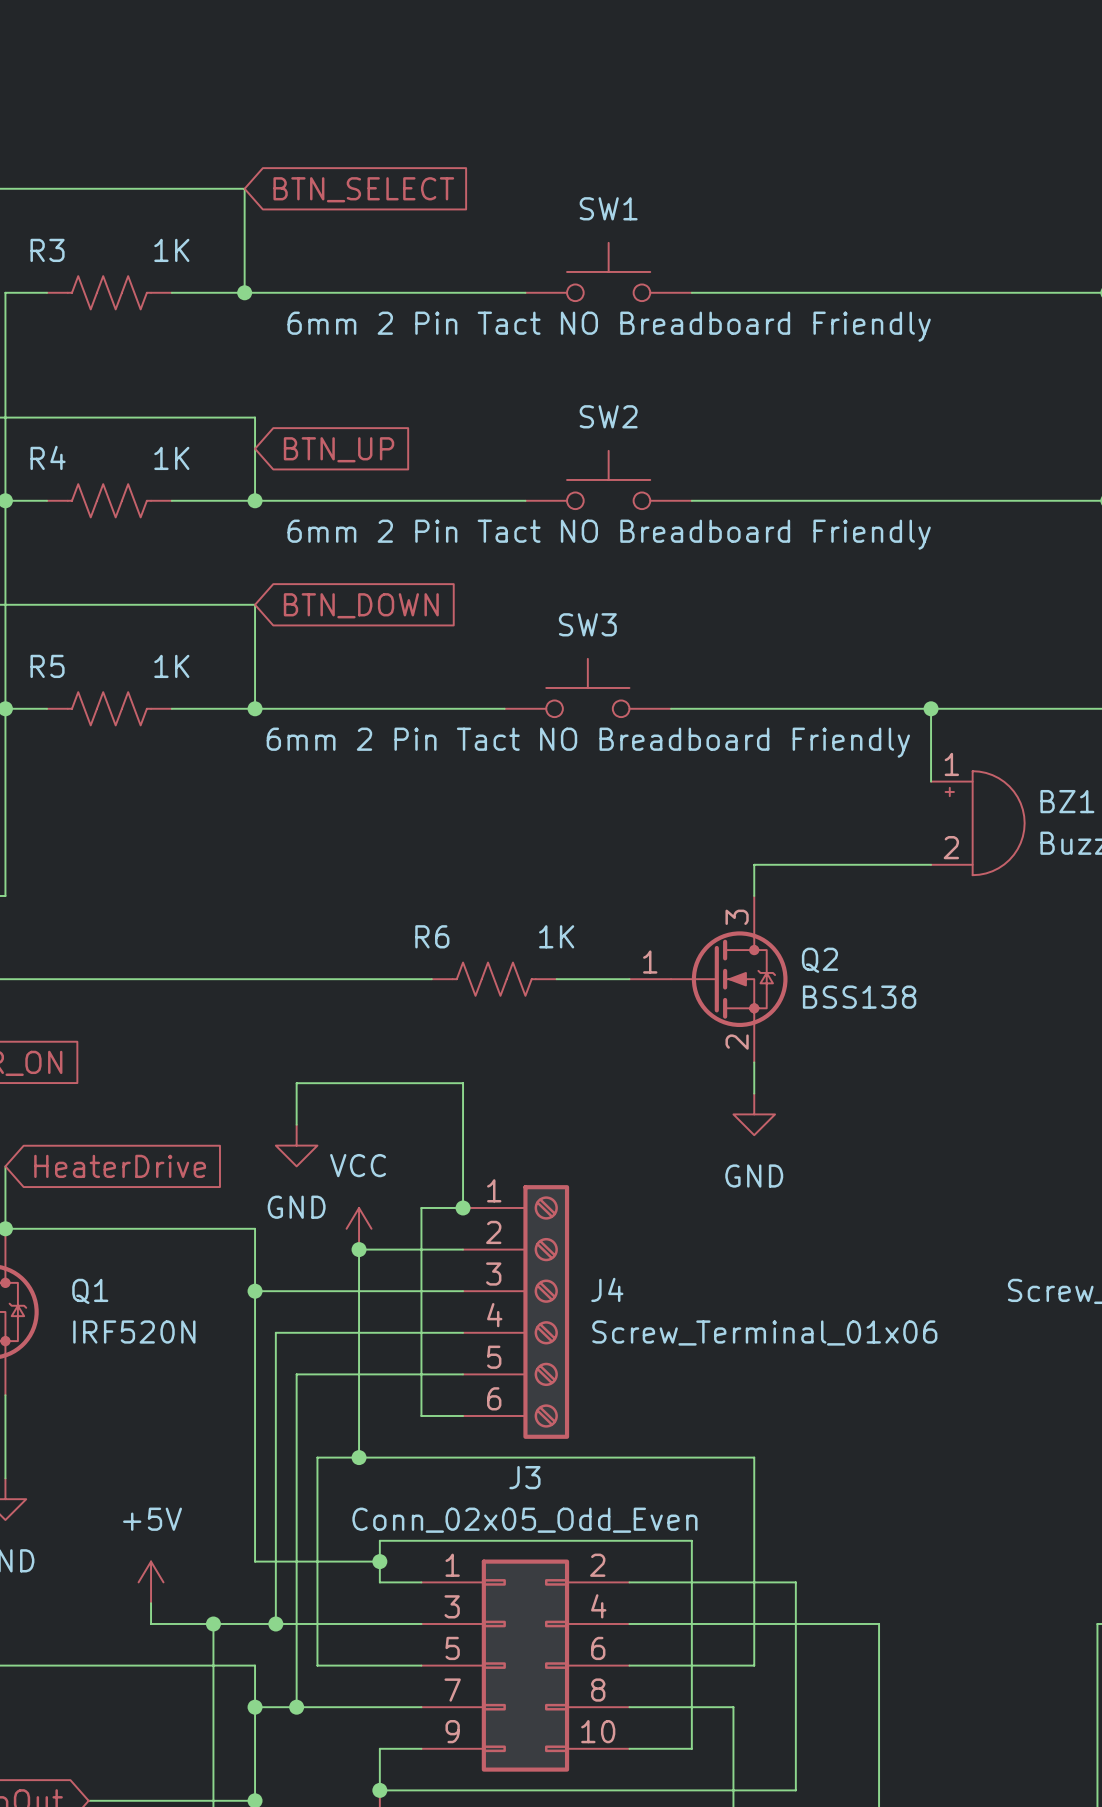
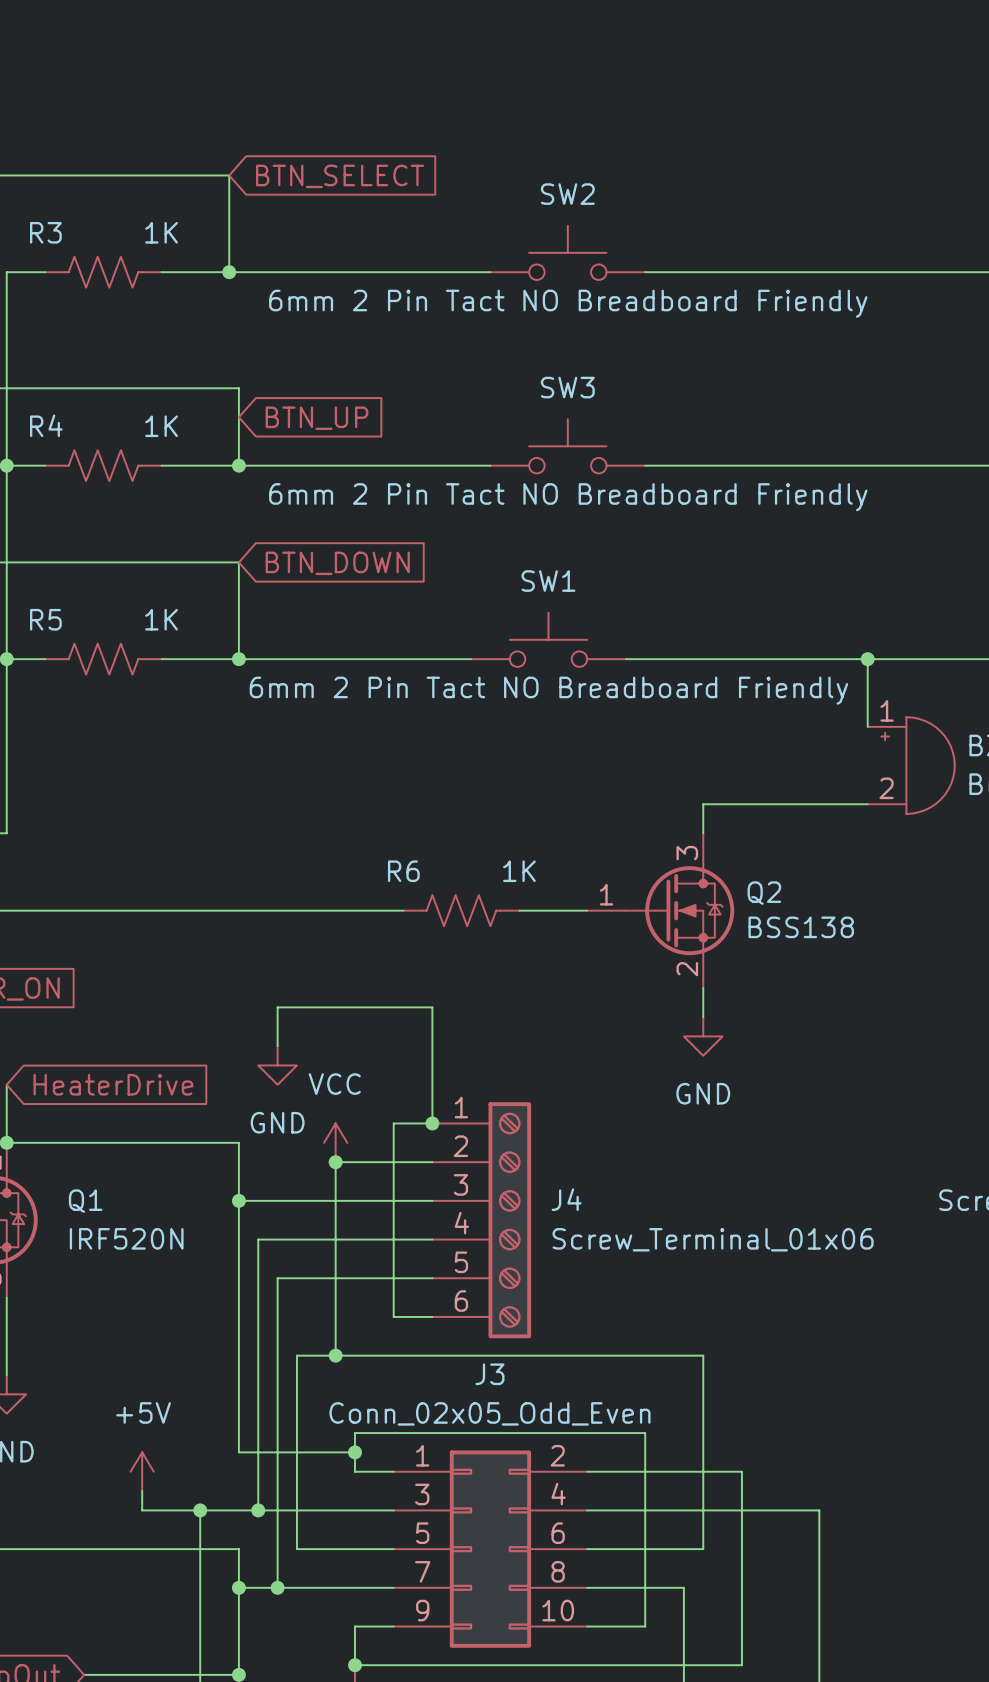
SW1 name: SW1 (608, 208) -> SW2 (567, 194)
SW2 name: SW2 (608, 416) -> SW3 (567, 387)
SW3 name: SW3 (587, 624) -> SW1 (548, 581)

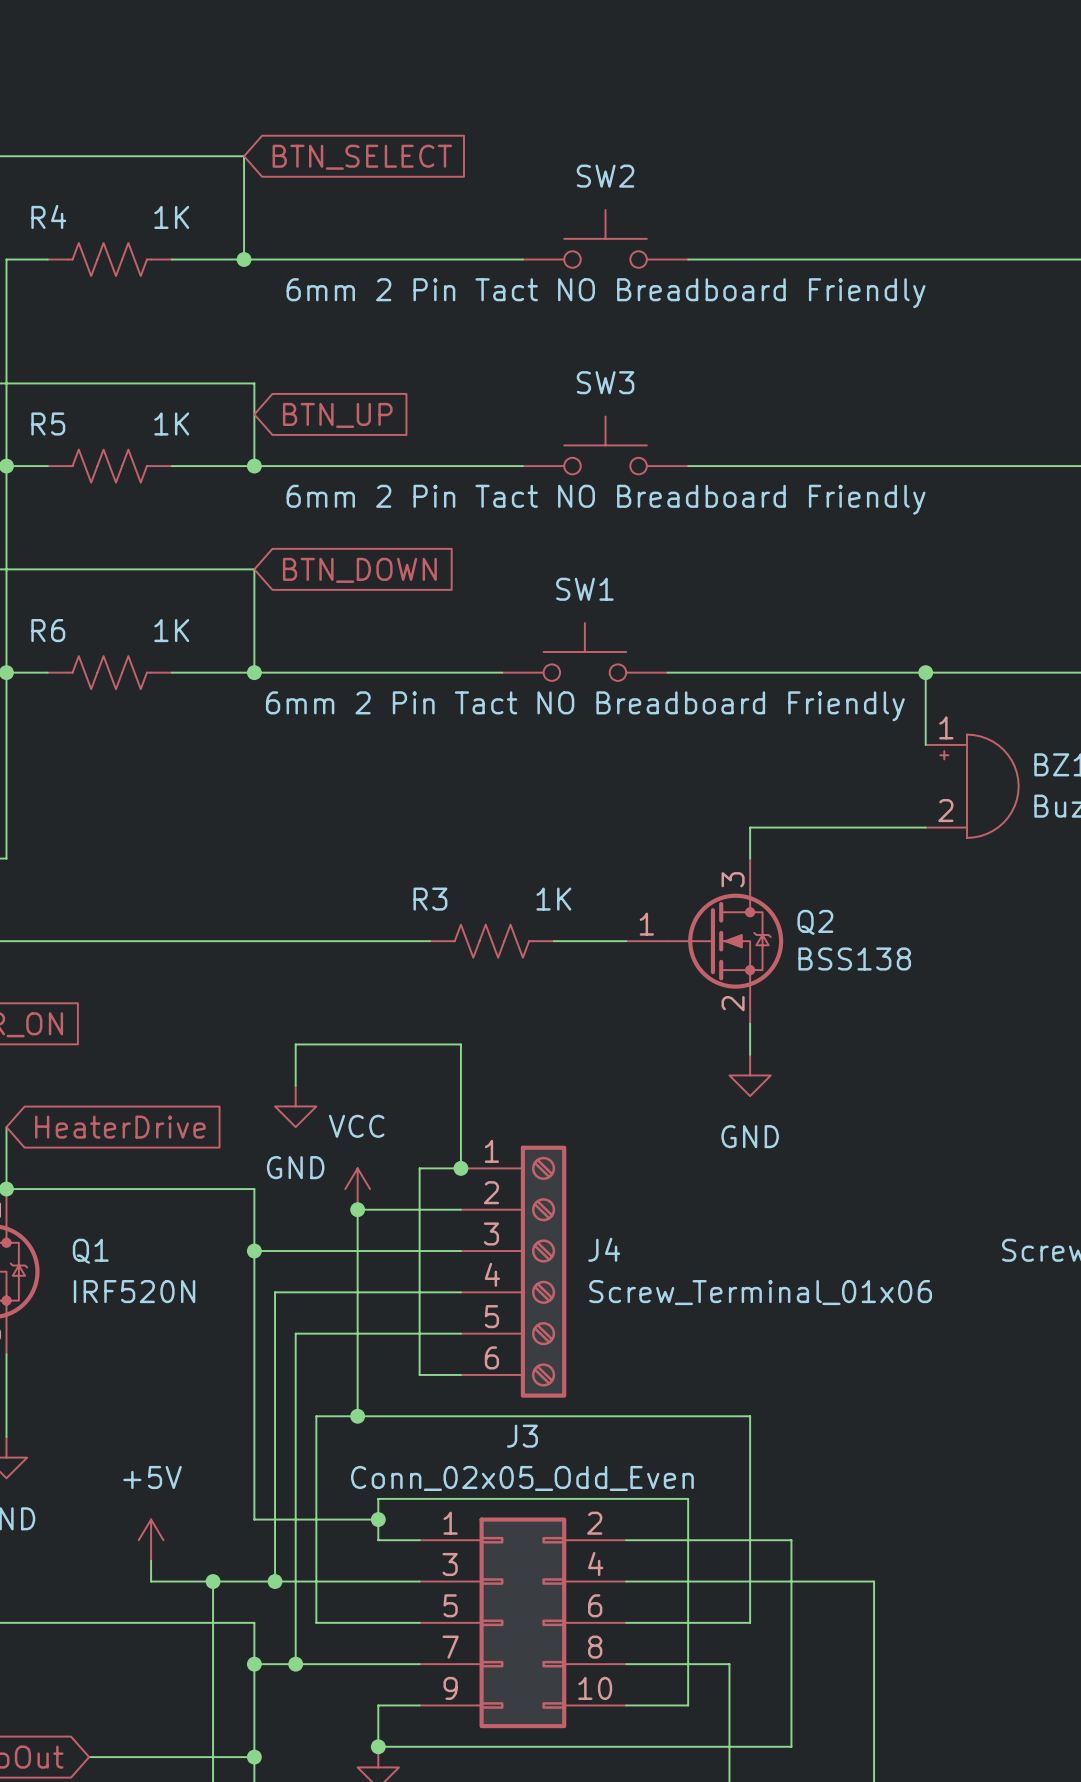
R3 name: R3 (45, 232) -> R4 (48, 216)
R4 name: R4 (46, 425) -> R5 (48, 423)
R5 name: R5 (45, 619) -> R6 (48, 630)
R6 name: R6 (403, 871) -> R3 (430, 899)

